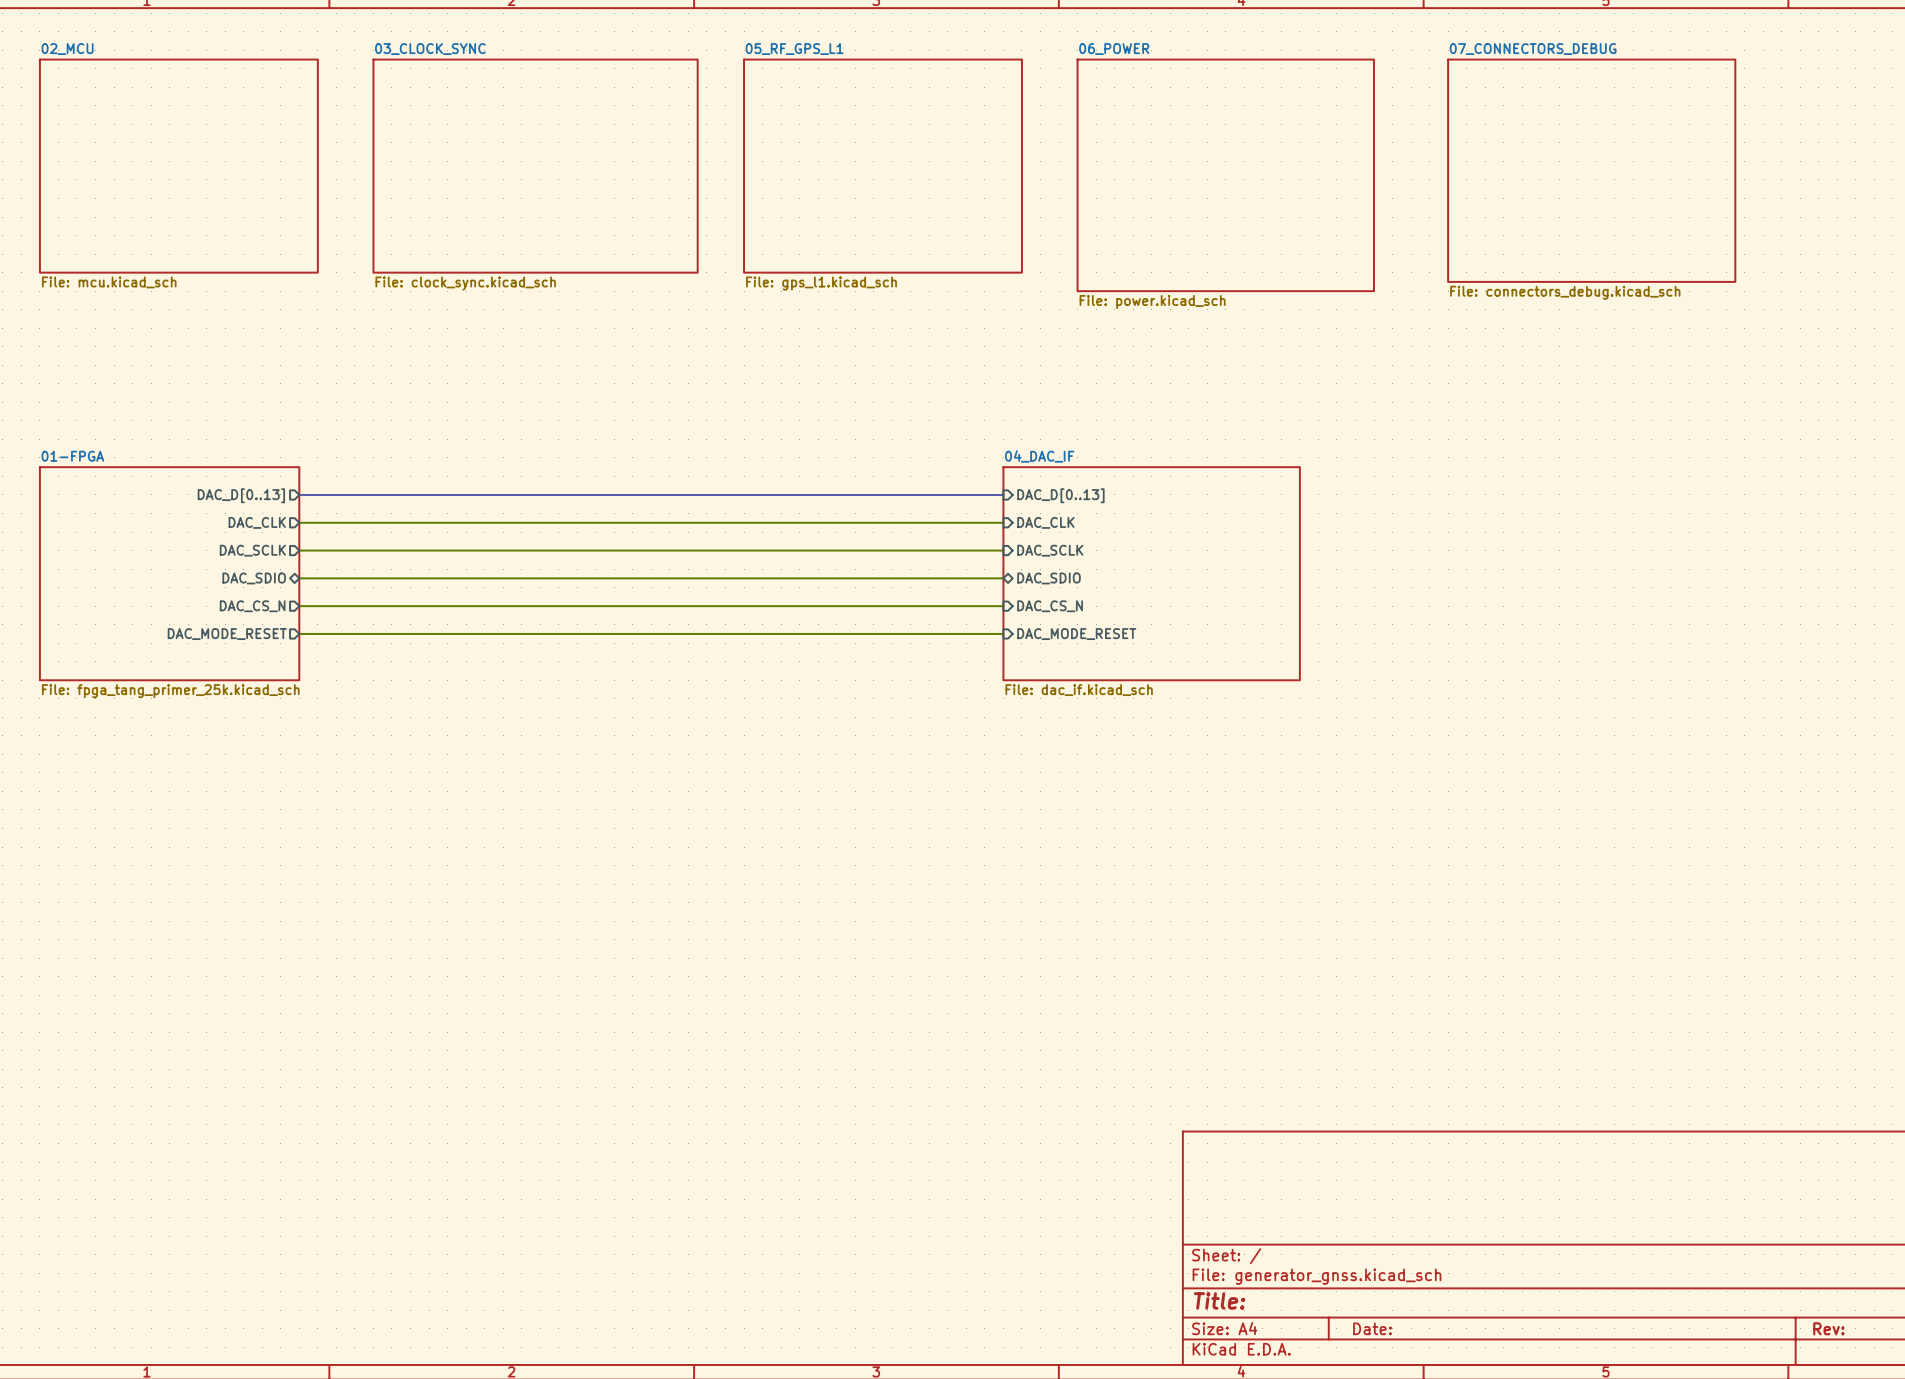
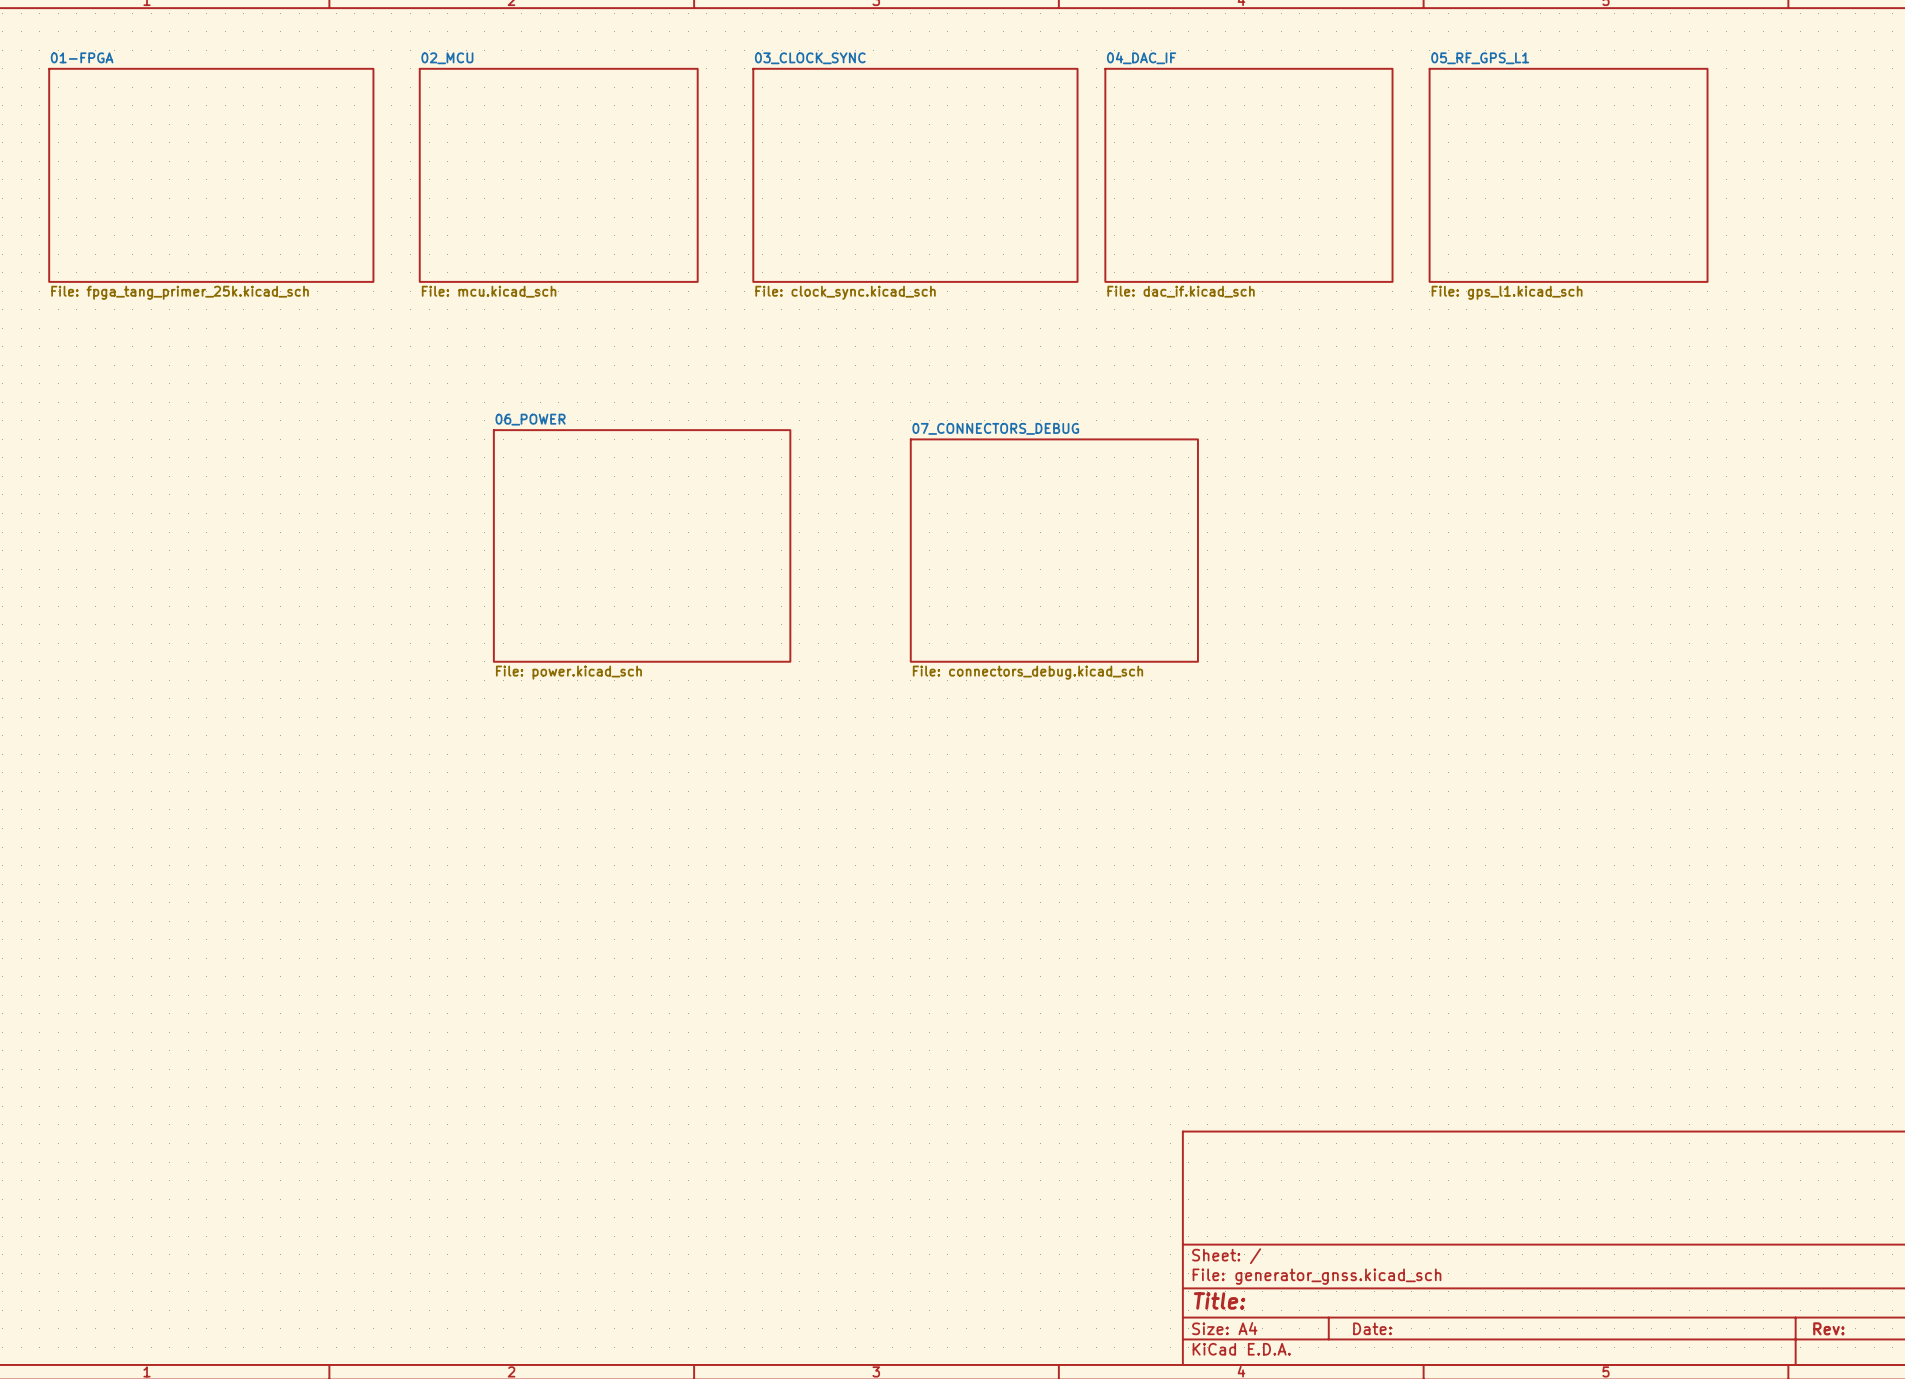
sheet 02_MCU position: (178, 166) -> (558, 175)
sheet 03_CLOCK_SYNC position: (535, 166) -> (915, 175)
sheet 05_RF_GPS_L1 position: (882, 166) -> (1568, 175)
sheet 07_CONNECTORS_DEBUG position: (1591, 170) -> (1054, 550)
sheet 06_POWER position: (1225, 175) -> (642, 545)
sheet 01-FPGA name position: 01-FPGA (72, 456) -> 01-FPGA (82, 57)
sheet 01-FPGA shape: [39, 466, 300, 681] -> [48, 68, 374, 283]
sheet 04_DAC_IF shape: [1002, 466, 1301, 681] -> [1104, 68, 1394, 283]
bus: (299, 494) (1003, 494) -> none
sheet pin: DAC_D[0..13] (241, 495) -> none
sheet pin: DAC_D[0..13] (1060, 495) -> none
sheet pin: DAC_CLK (257, 522) -> none
wire: (299, 522) (1003, 522) -> none
sheet pin: DAC_CLK (1045, 522) -> none
sheet pin: DAC_SCLK (252, 550) -> none
wire: (299, 550) (1003, 550) -> none
sheet pin: DAC_SCLK (1050, 550) -> none
sheet pin: DAC_SDIO (254, 578) -> none
wire: (299, 578) (1003, 578) -> none
sheet pin: DAC_SDIO (1049, 578) -> none
sheet pin: DAC_CS_N (252, 606) -> none
wire: (299, 606) (1003, 606) -> none
sheet pin: DAC_CS_N (1050, 606) -> none
wire: (299, 633) (1003, 633) -> none
sheet pin: DAC_MODE_RESET (227, 634) -> none
sheet pin: DAC_MODE_RESET (1076, 634) -> none
sheet 01-FPGA value position: File: fpga_tang_primer_25k.kicad_sch (170, 691) -> File: fpga_tang_primer_25k.kicad_sch (180, 292)

